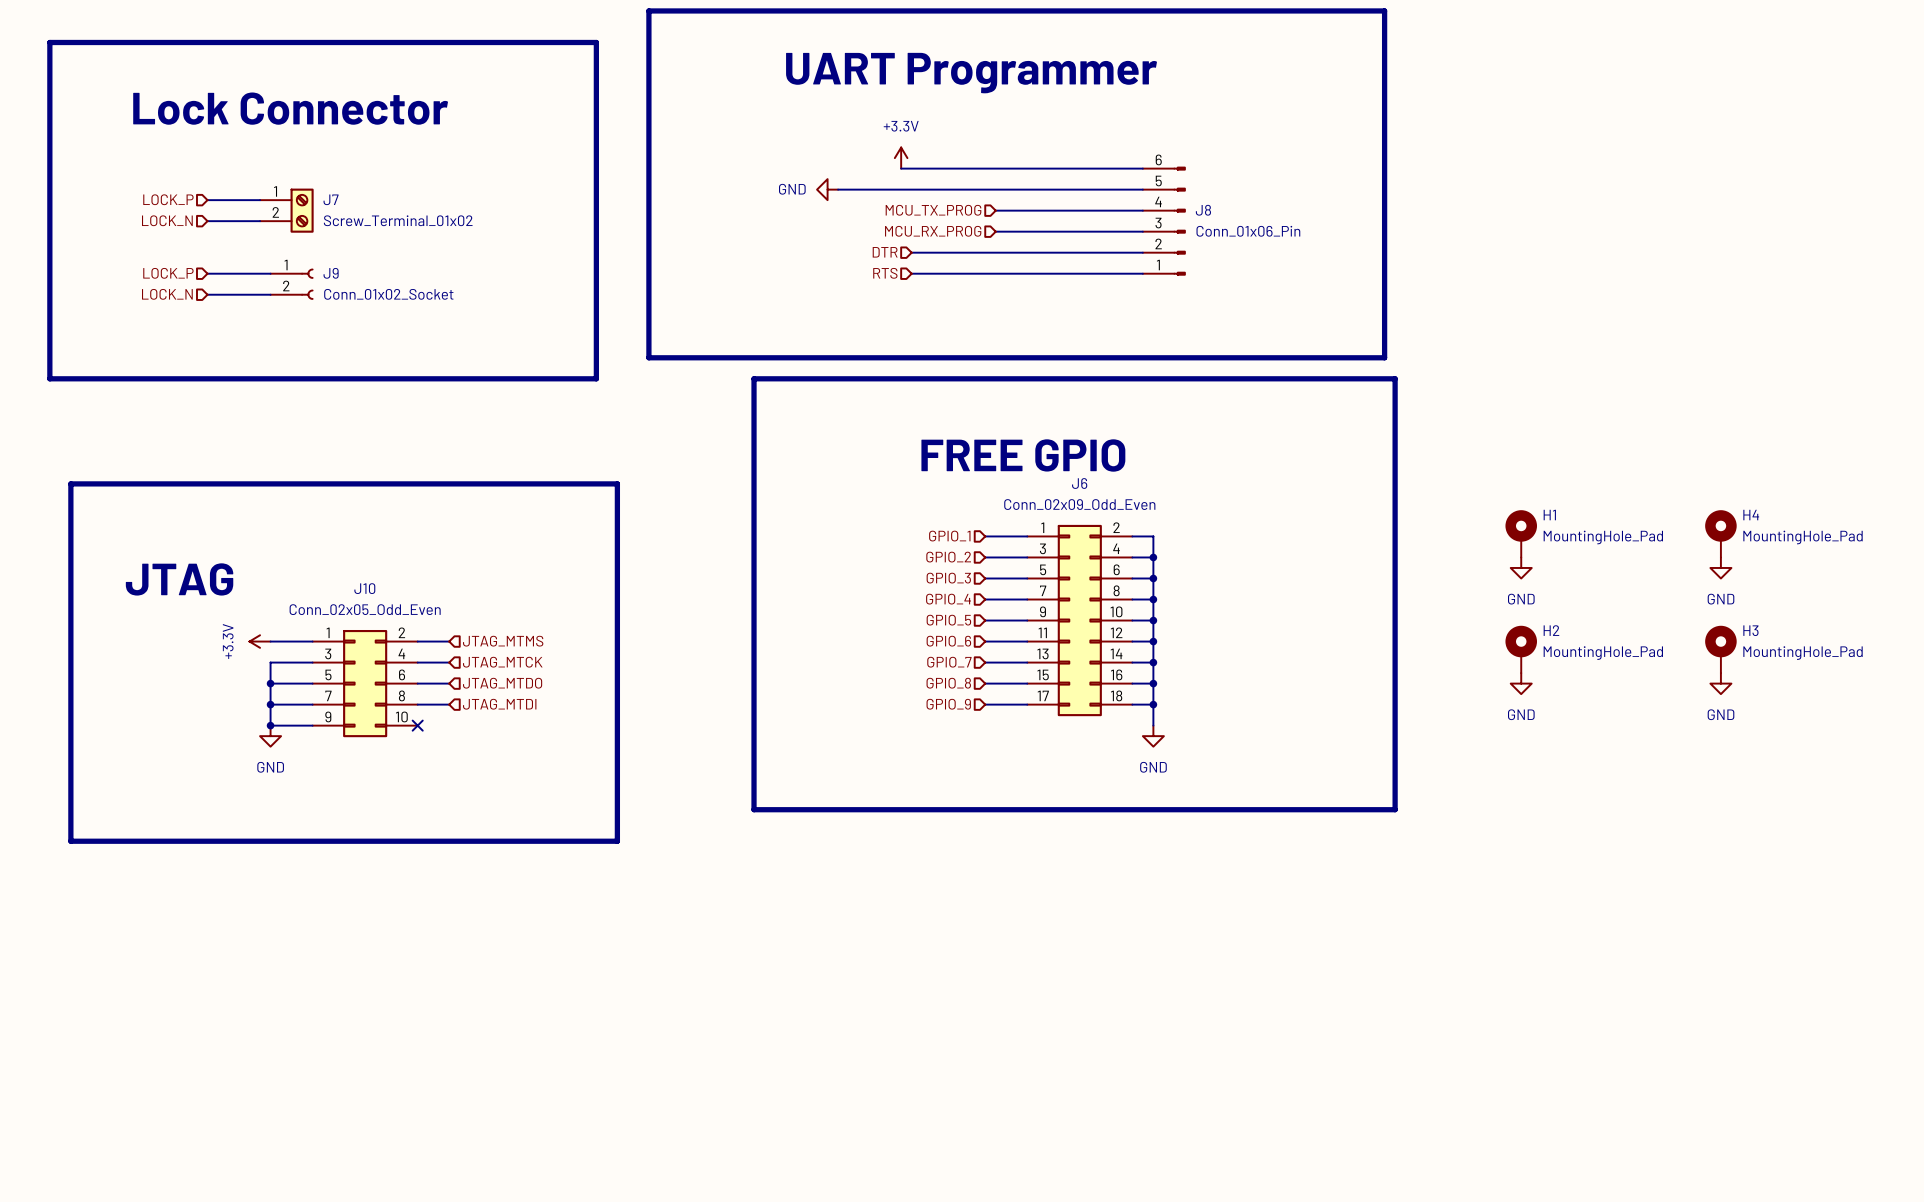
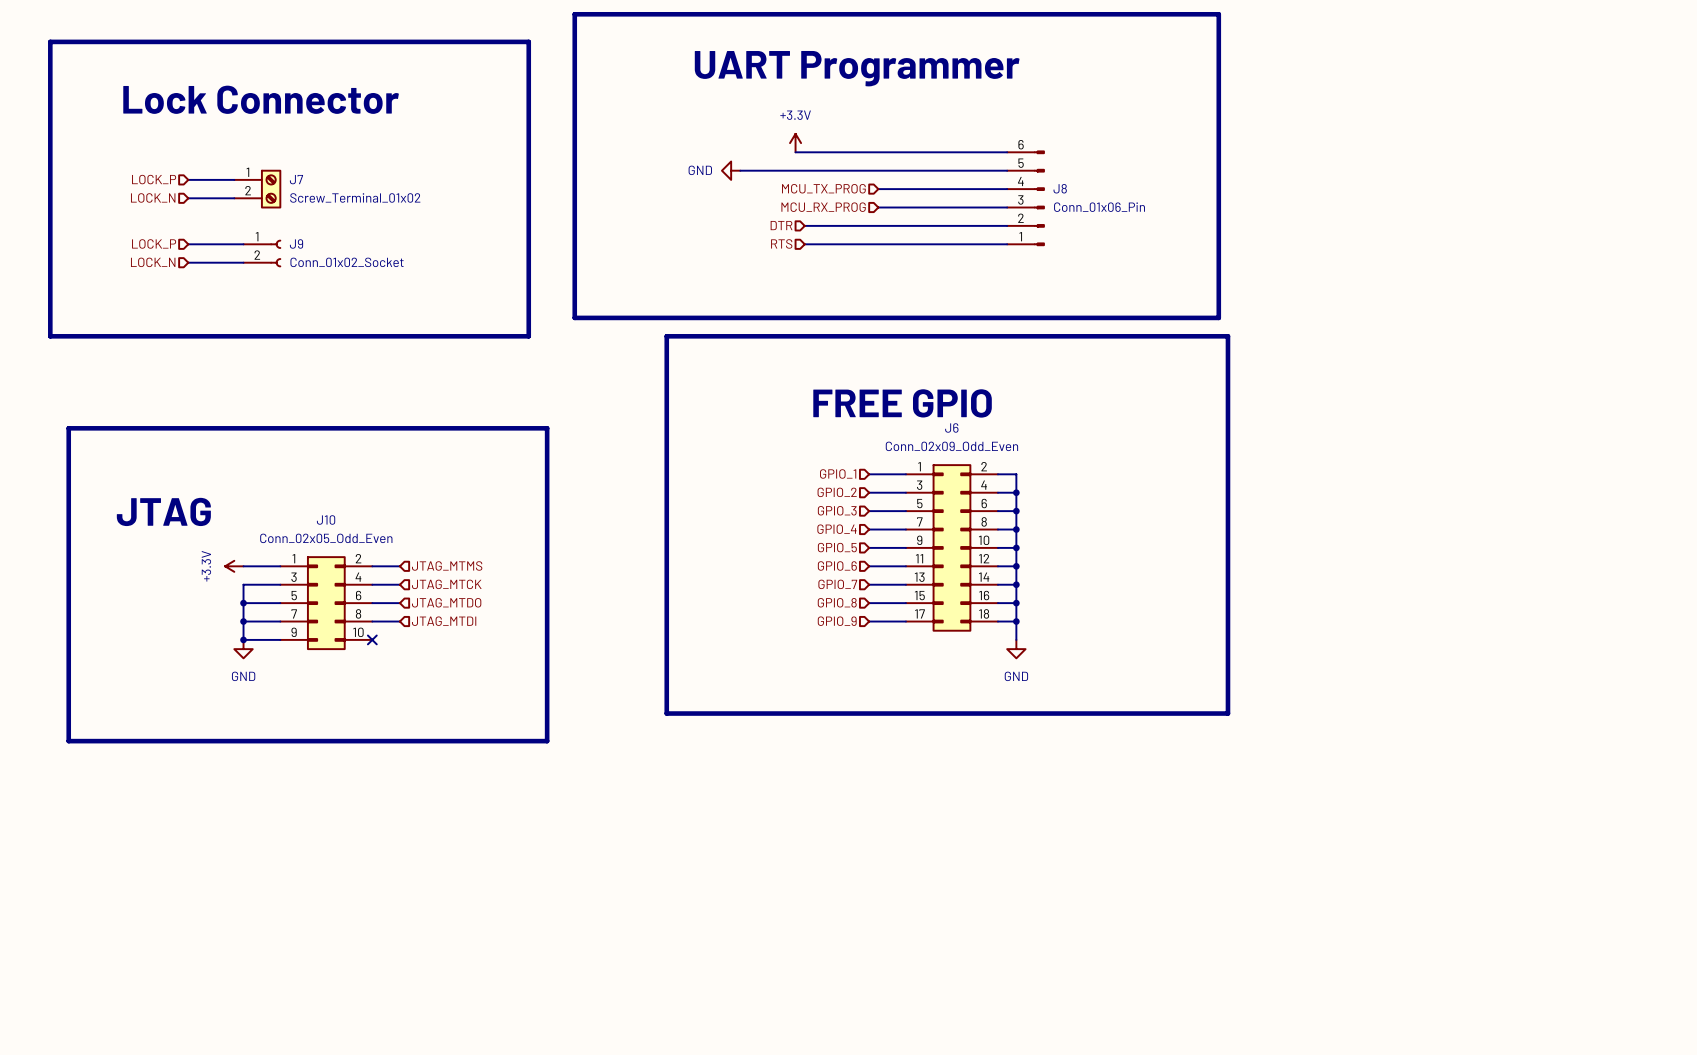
H1: MountingHole_Pad (1521, 533) -> none
H4: MountingHole_Pad (1720, 533) -> none
power symbol: GND (1521, 567) -> none
power symbol: GND (1720, 567) -> none
H2: MountingHole_Pad (1521, 649) -> none
H3: MountingHole_Pad (1720, 649) -> none
power symbol: GND (1521, 683) -> none
power symbol: GND (1720, 683) -> none

